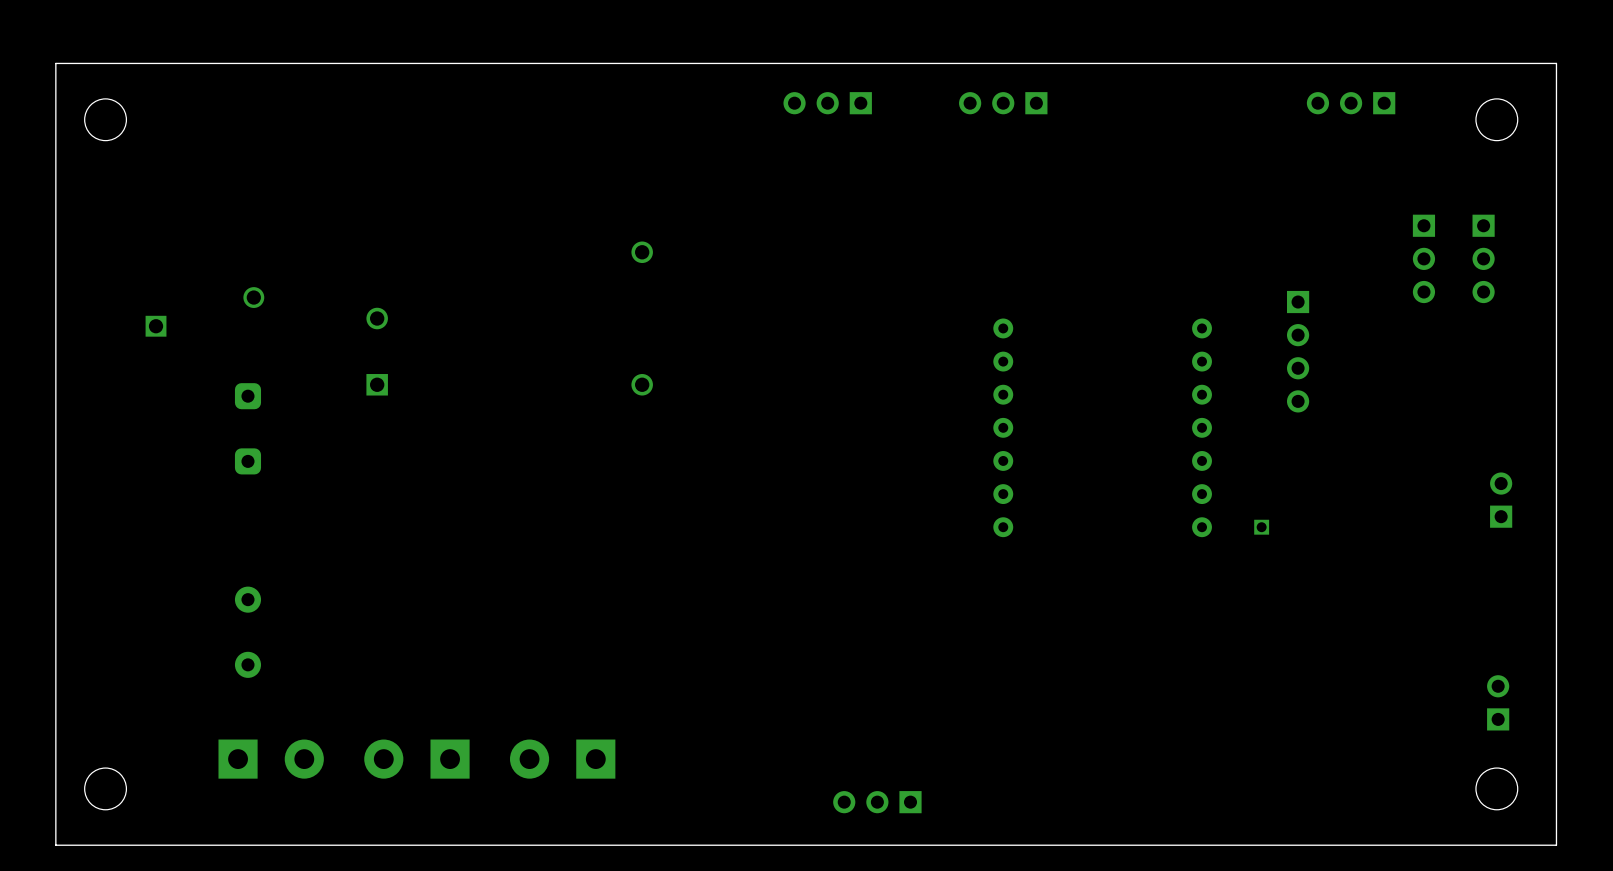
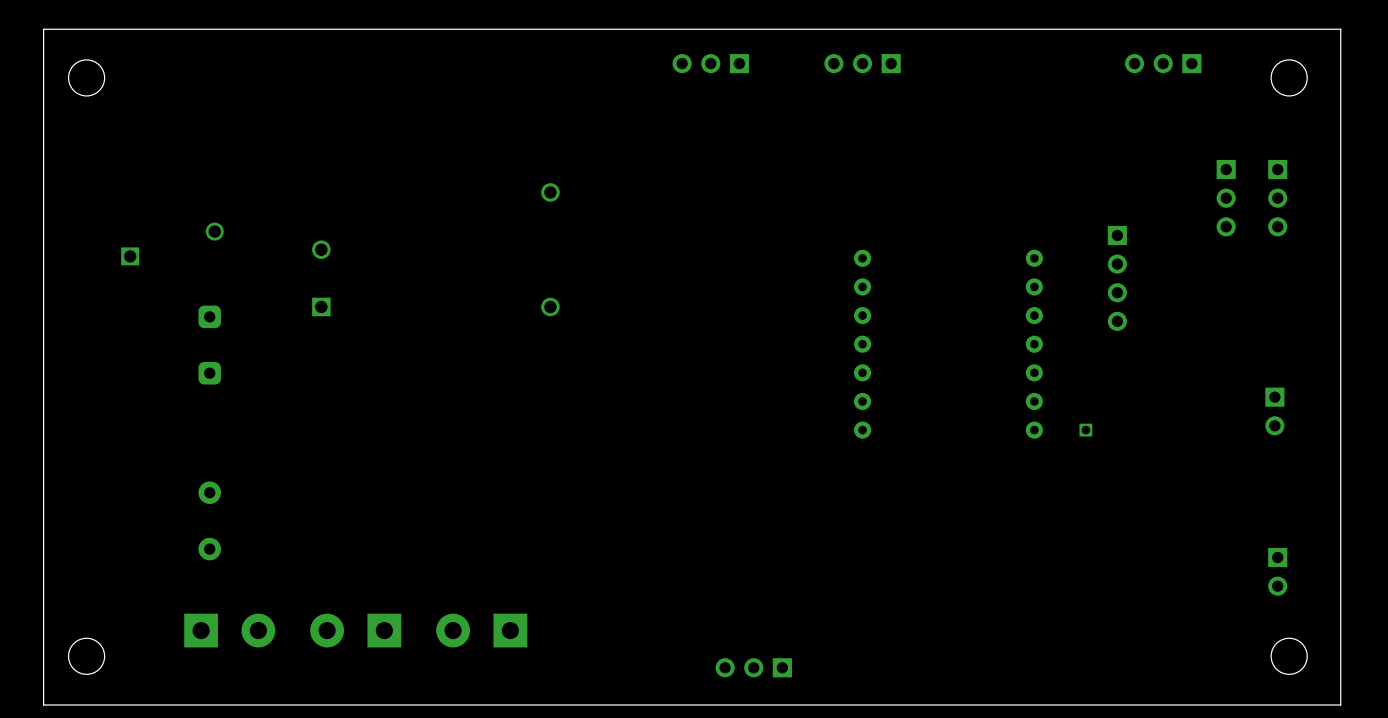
part rotation: 0° (1501, 500) -> 180° (1274, 411)
part rotation: 0° (1498, 702) -> 180° (1277, 571)

